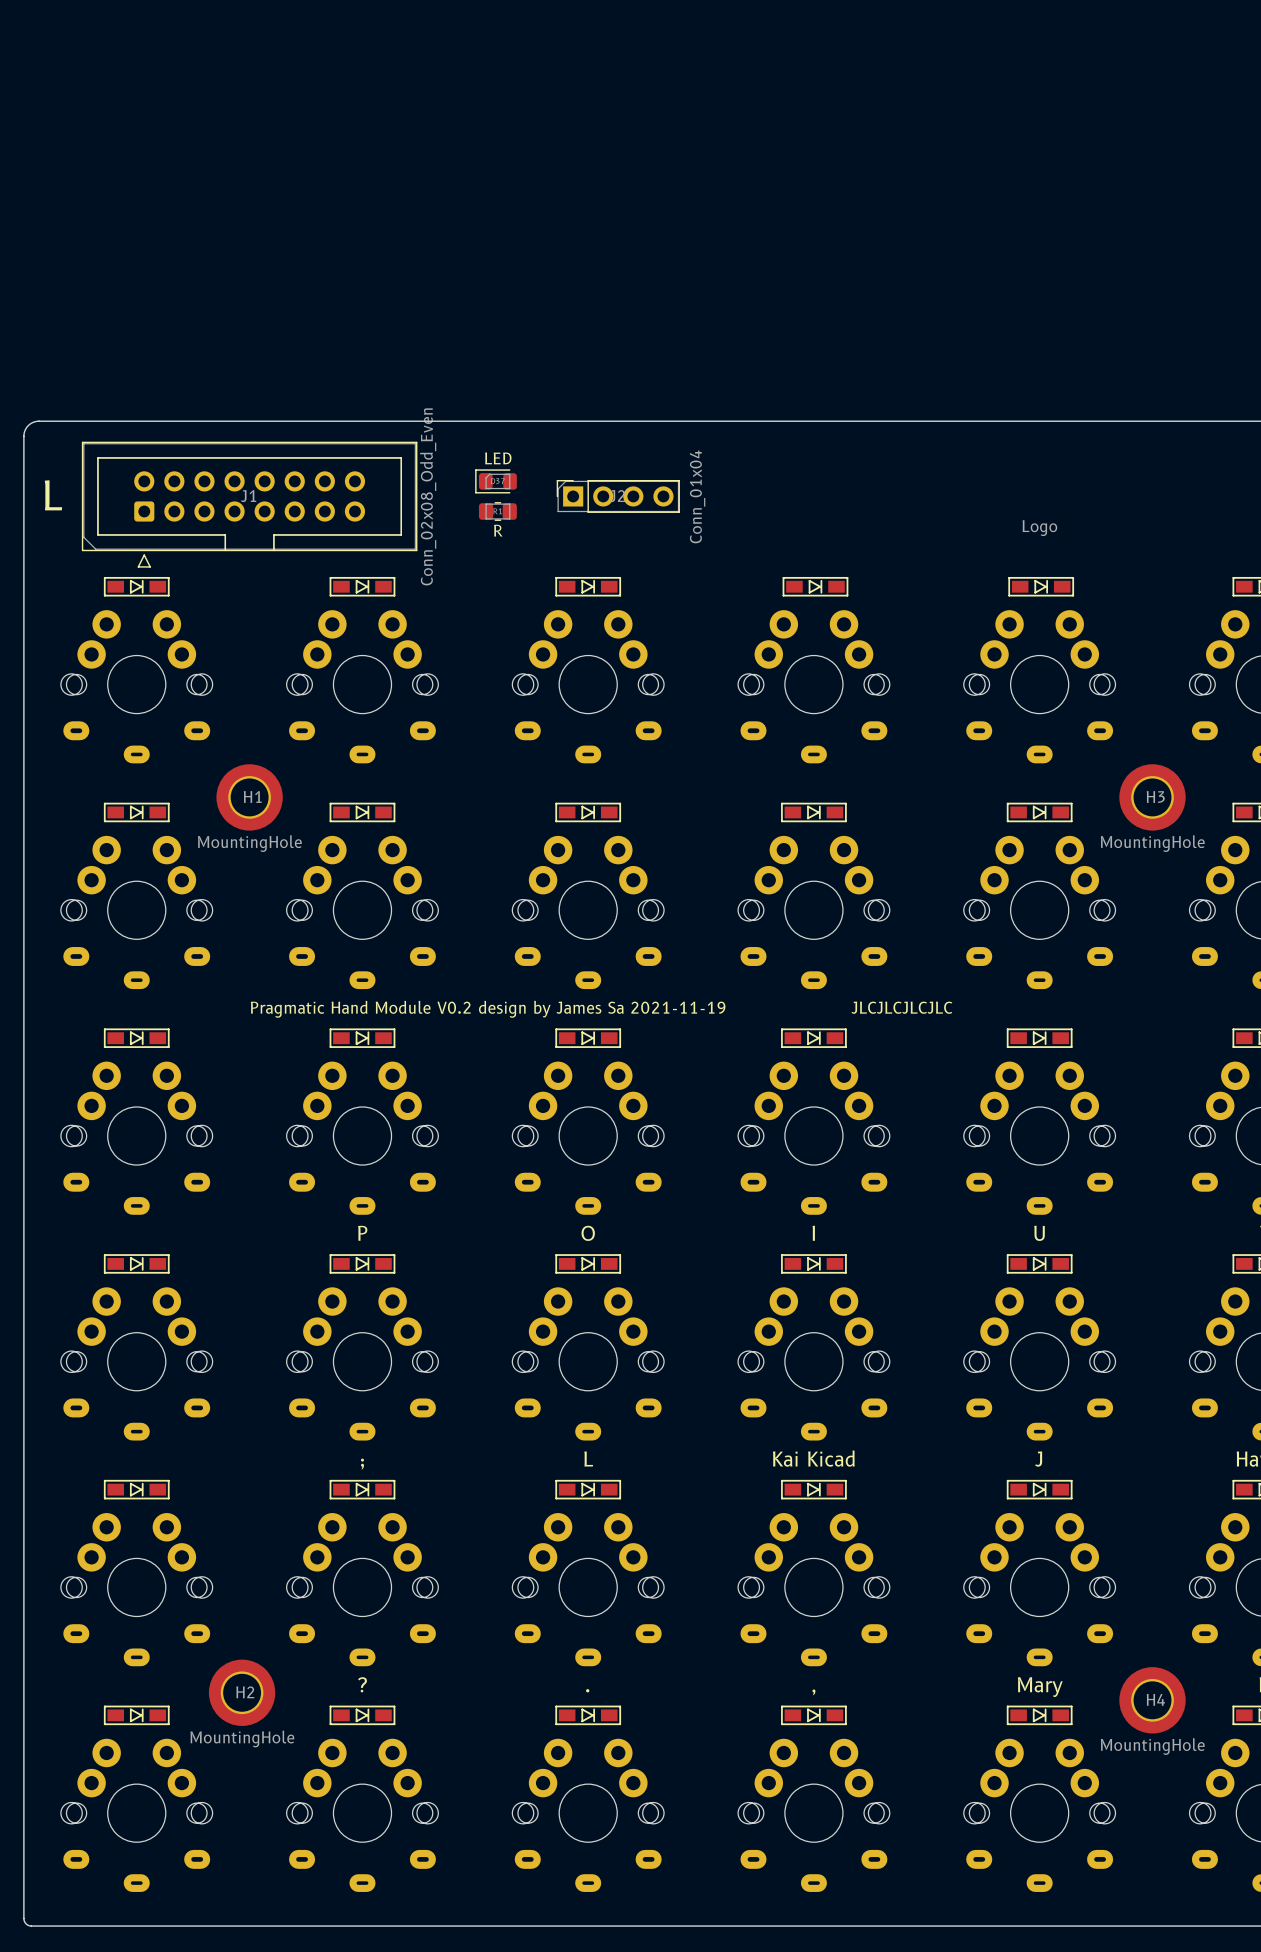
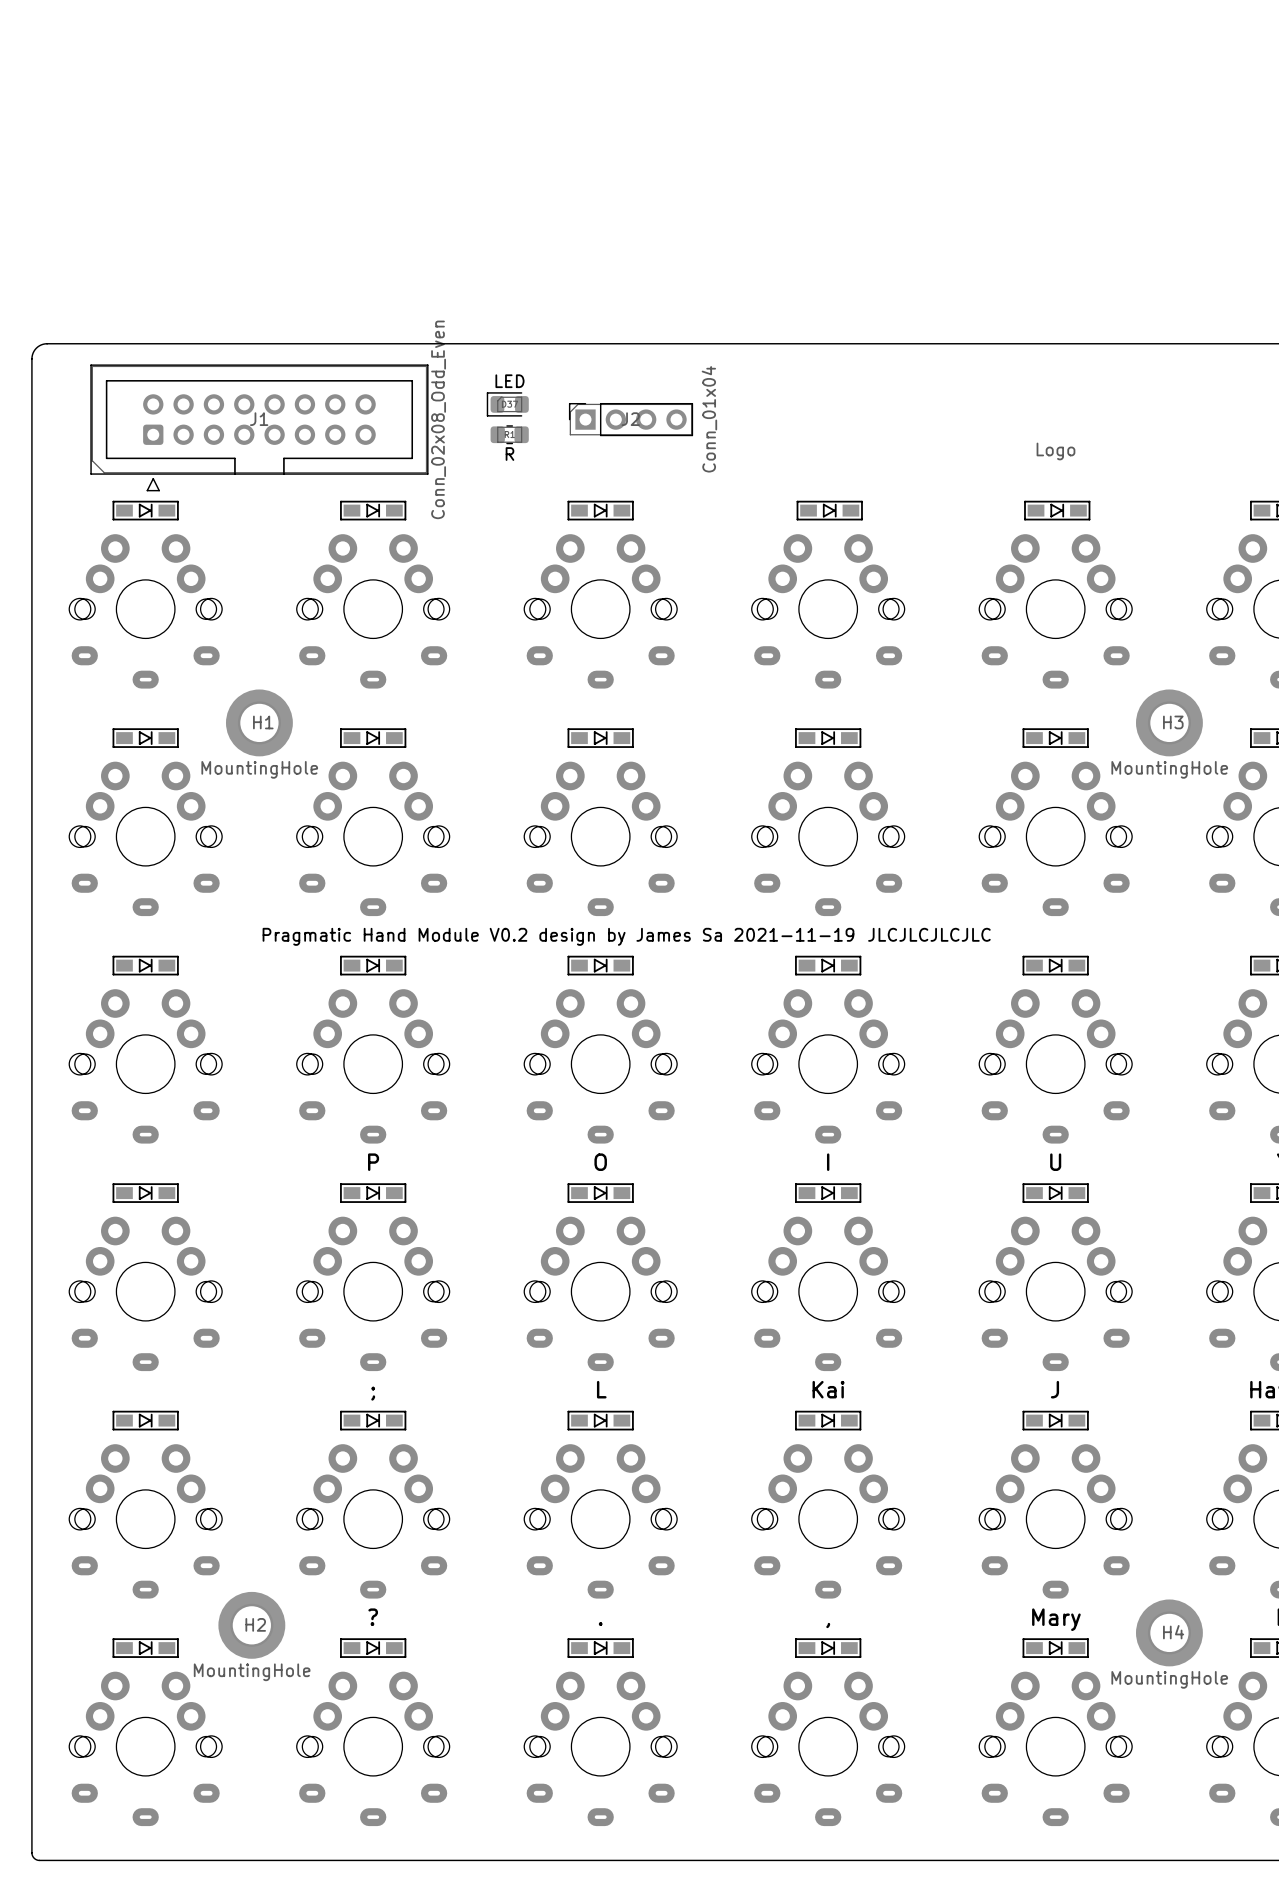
text: L (53, 495) -> none
text: Kai Kicad (813, 1458) -> Kai (828, 1389)

